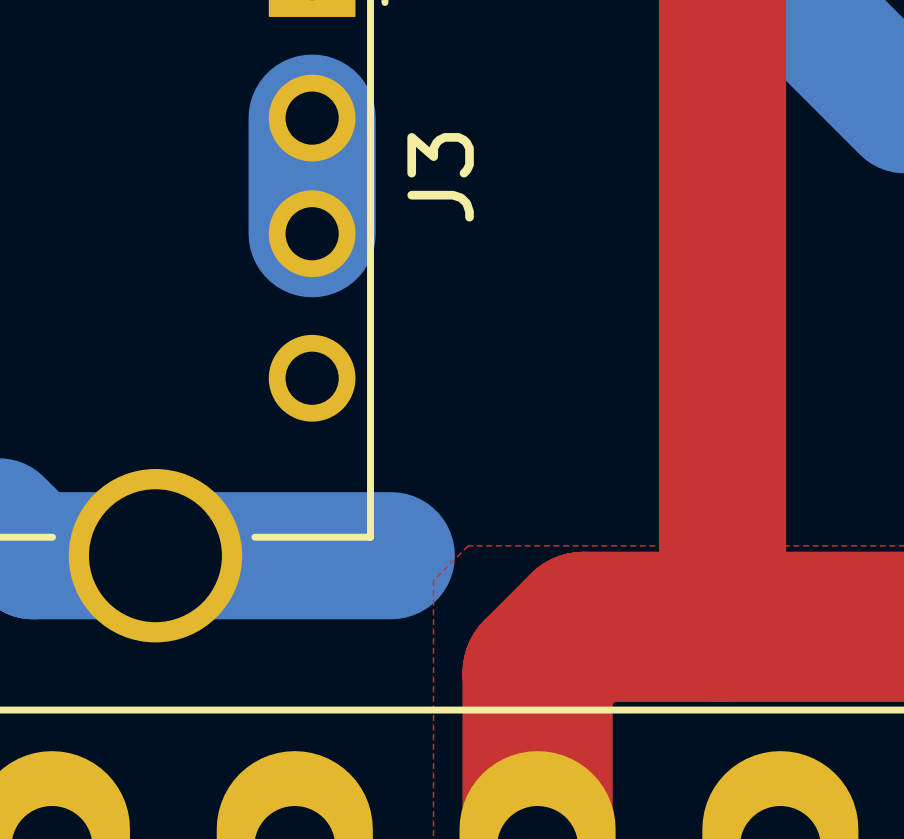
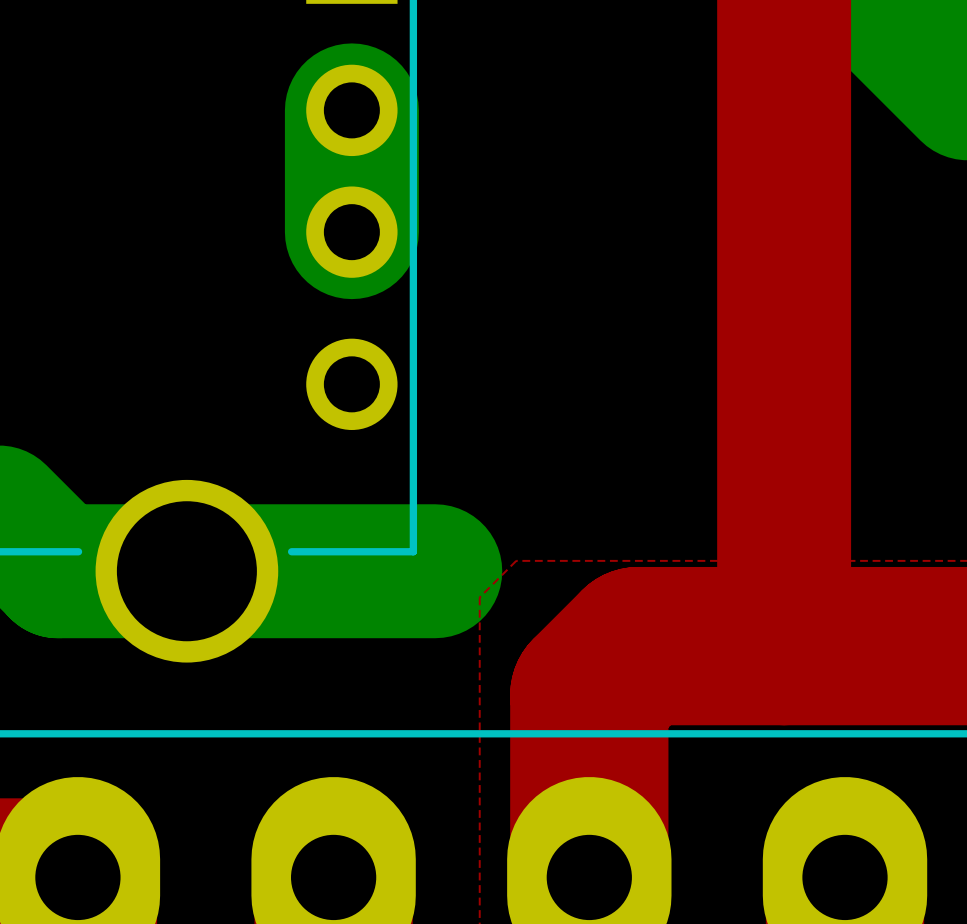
J3 name: J3 (440, 177) -> none

